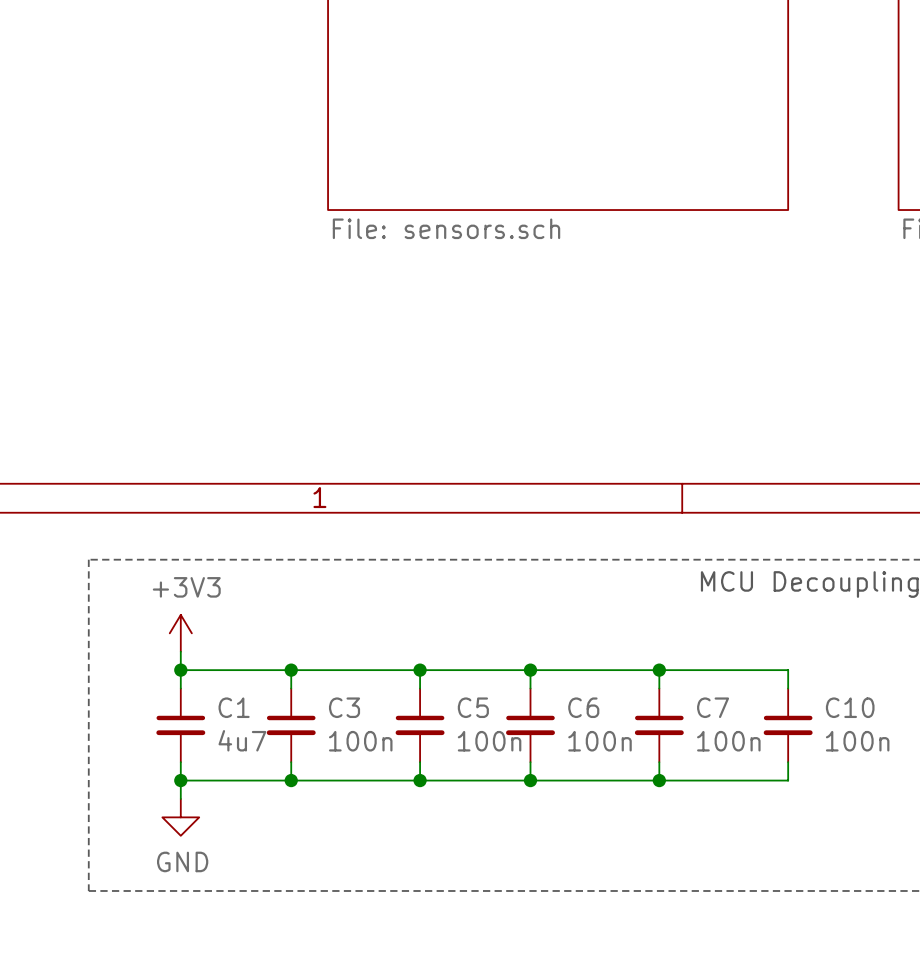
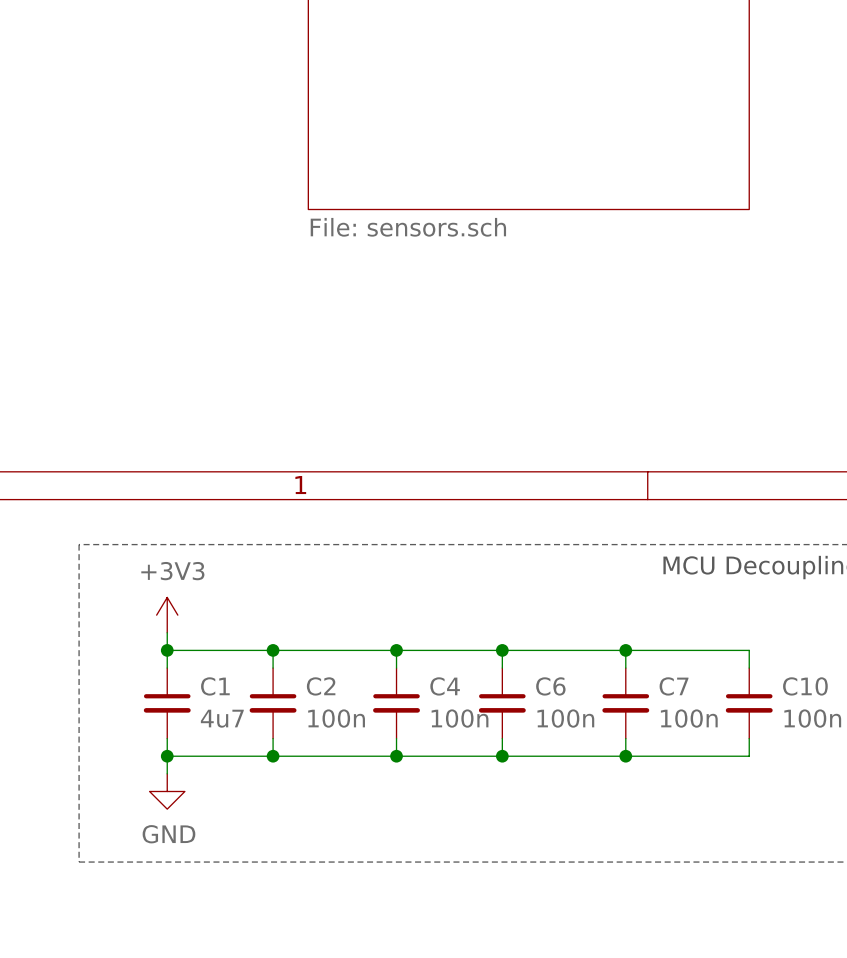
C3 name: C3 (344, 707) -> C2 (321, 686)
C5 name: C5 (473, 707) -> C4 (445, 686)

